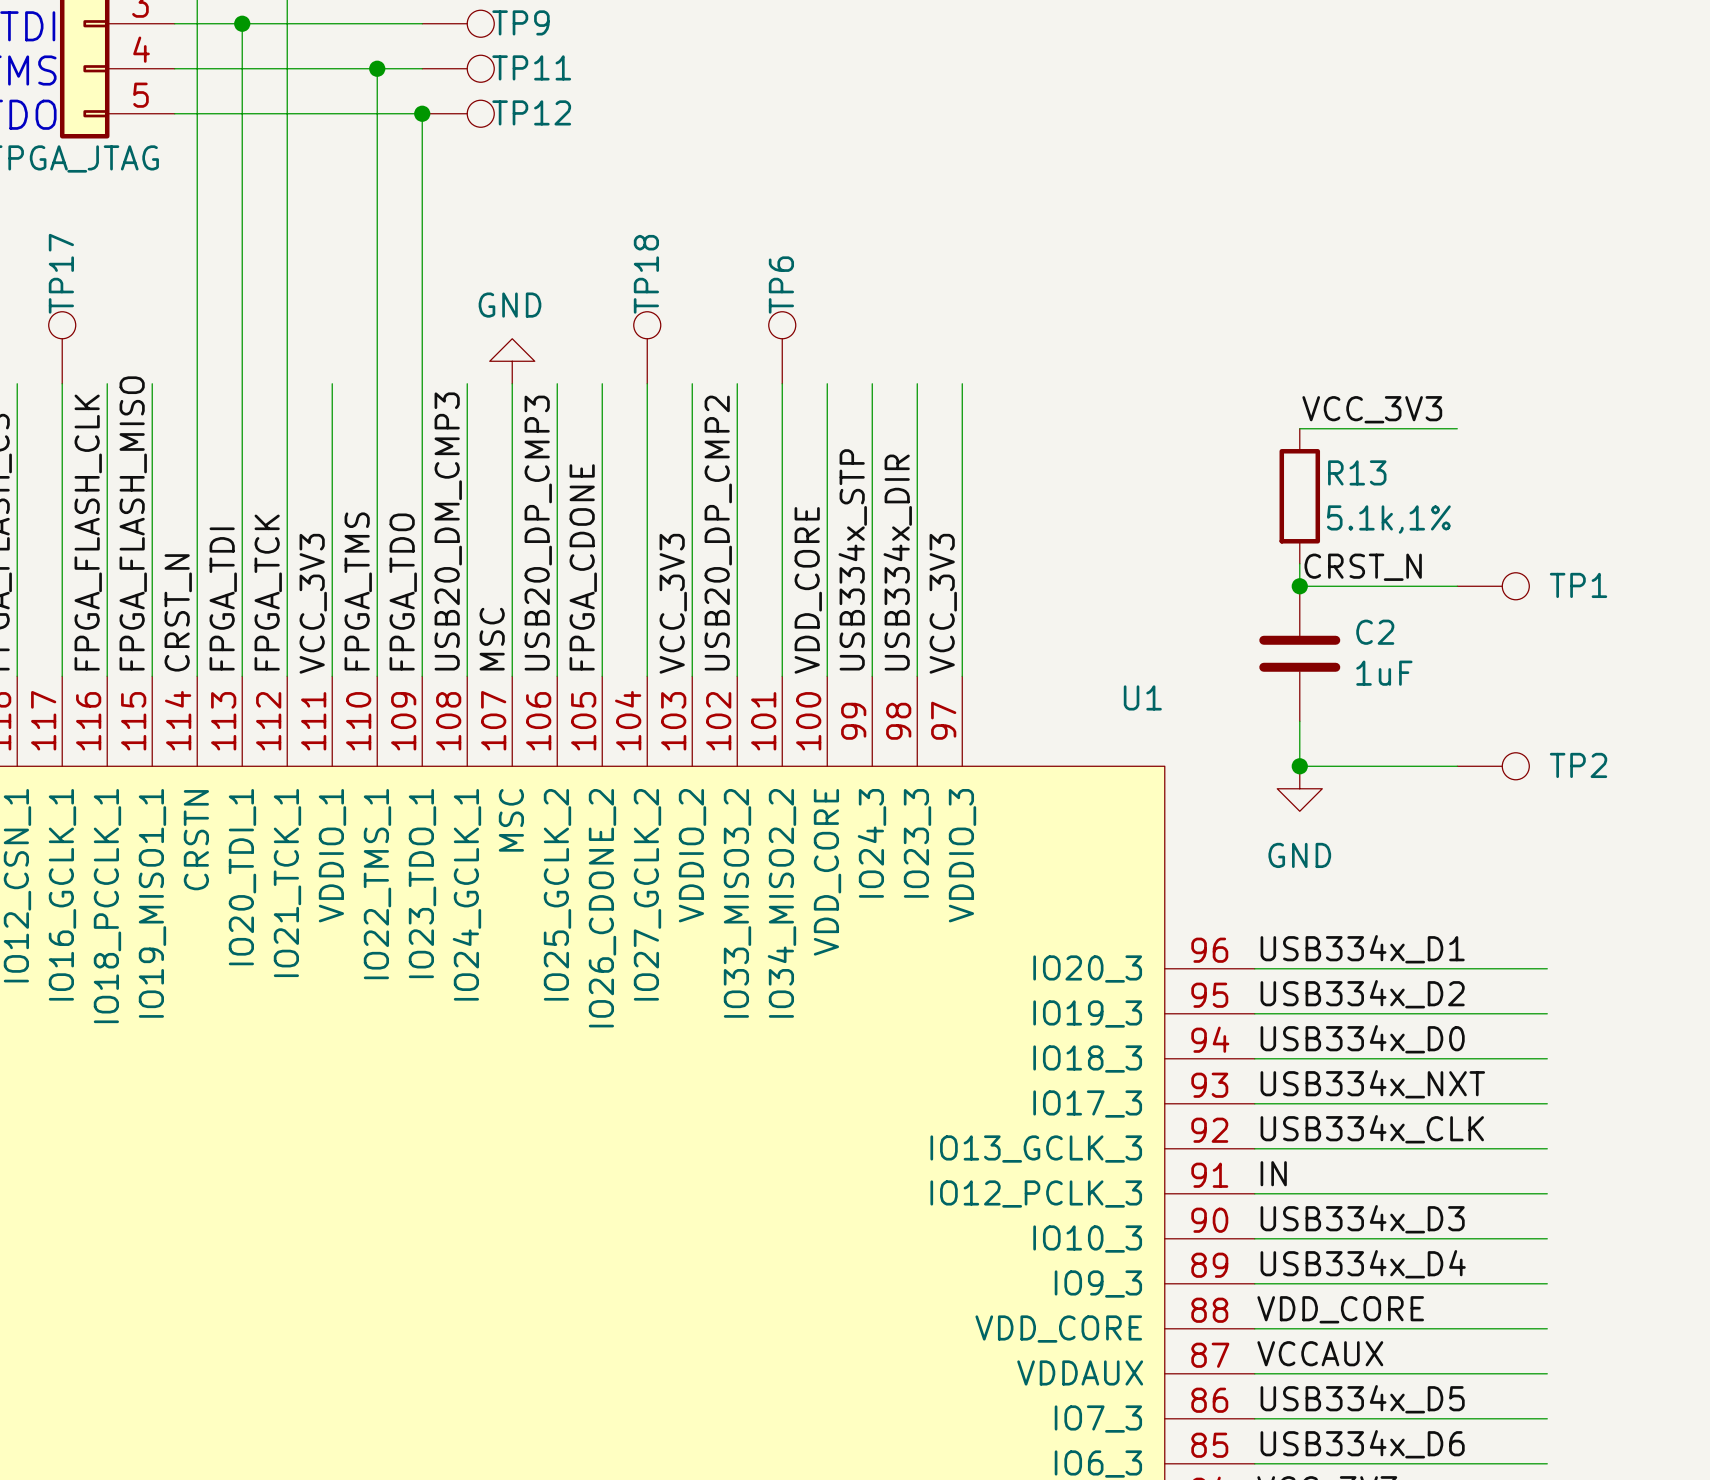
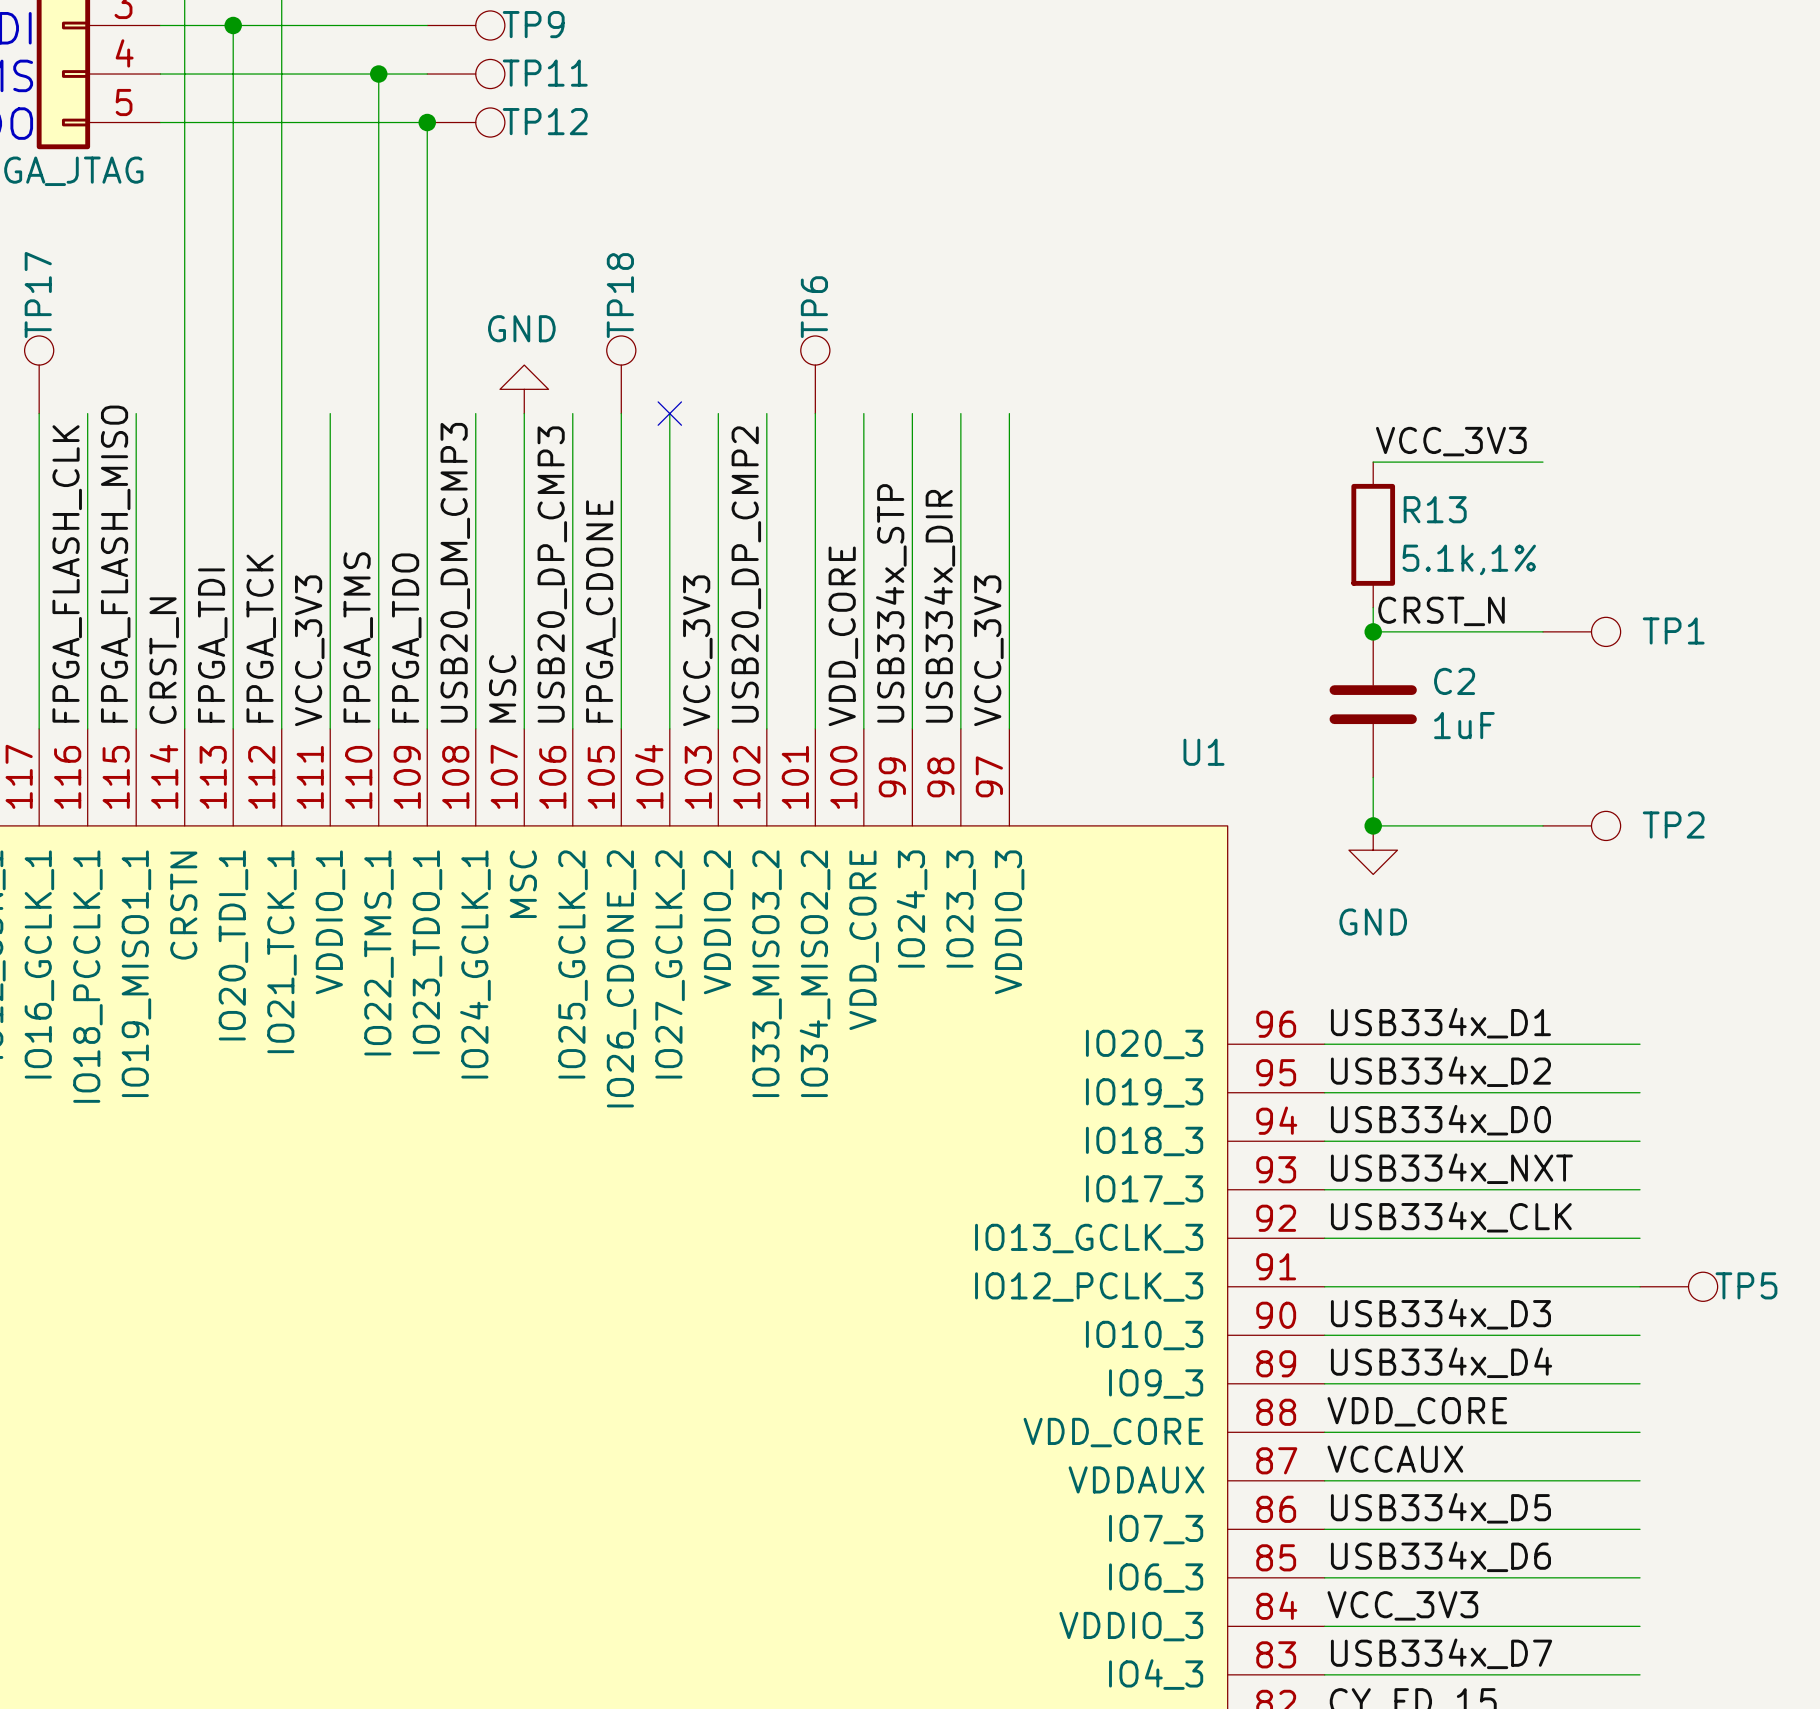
TP18 position: (647, 347) -> (621, 374)
no-connect mark: none -> (669, 413)
label: IN (1273, 1173) -> none
TP5: none -> (1678, 1286)

